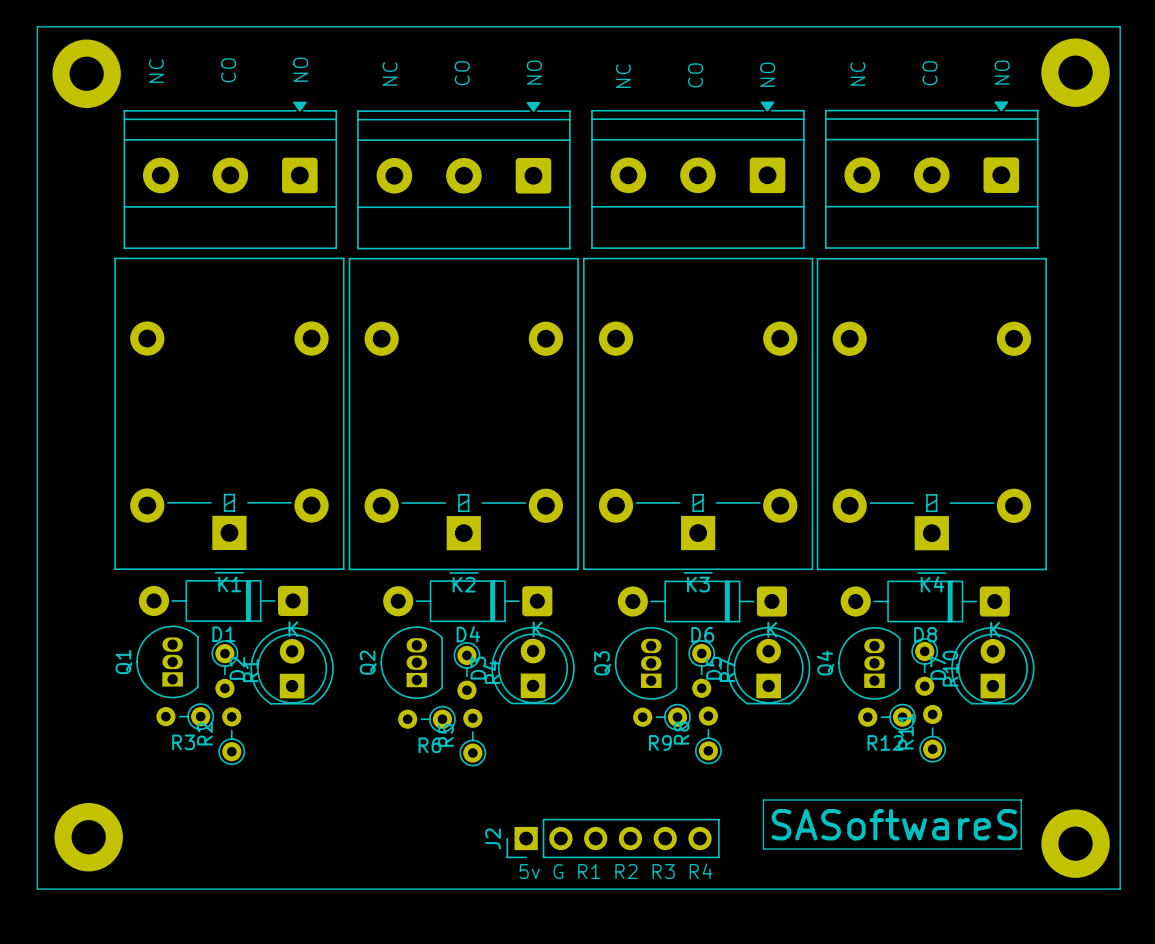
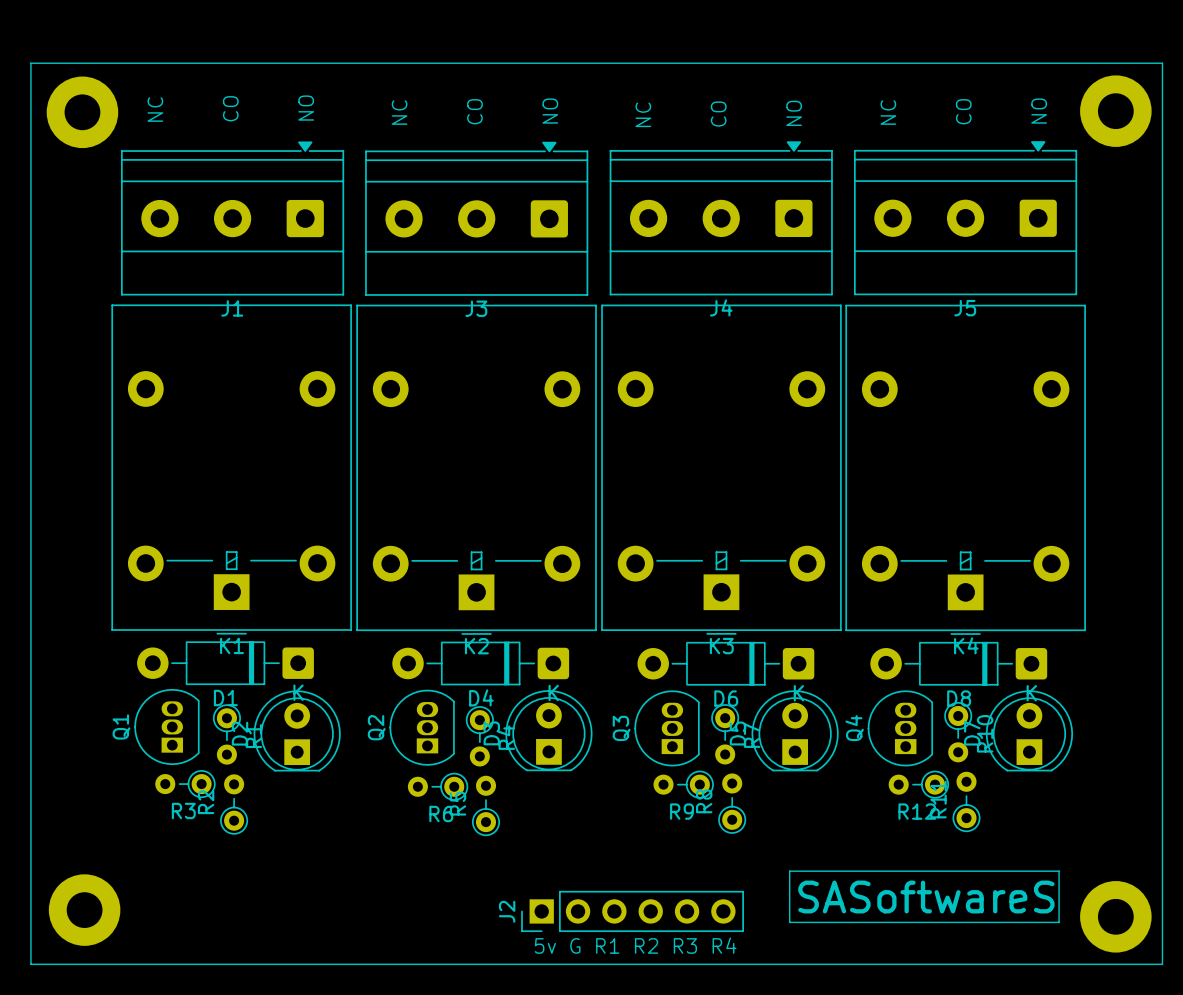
J4 name: none -> J4 (721, 307)
J1 name: none -> J1 (232, 308)
J3 name: none -> J3 (476, 308)
J5 name: none -> J5 (965, 308)

